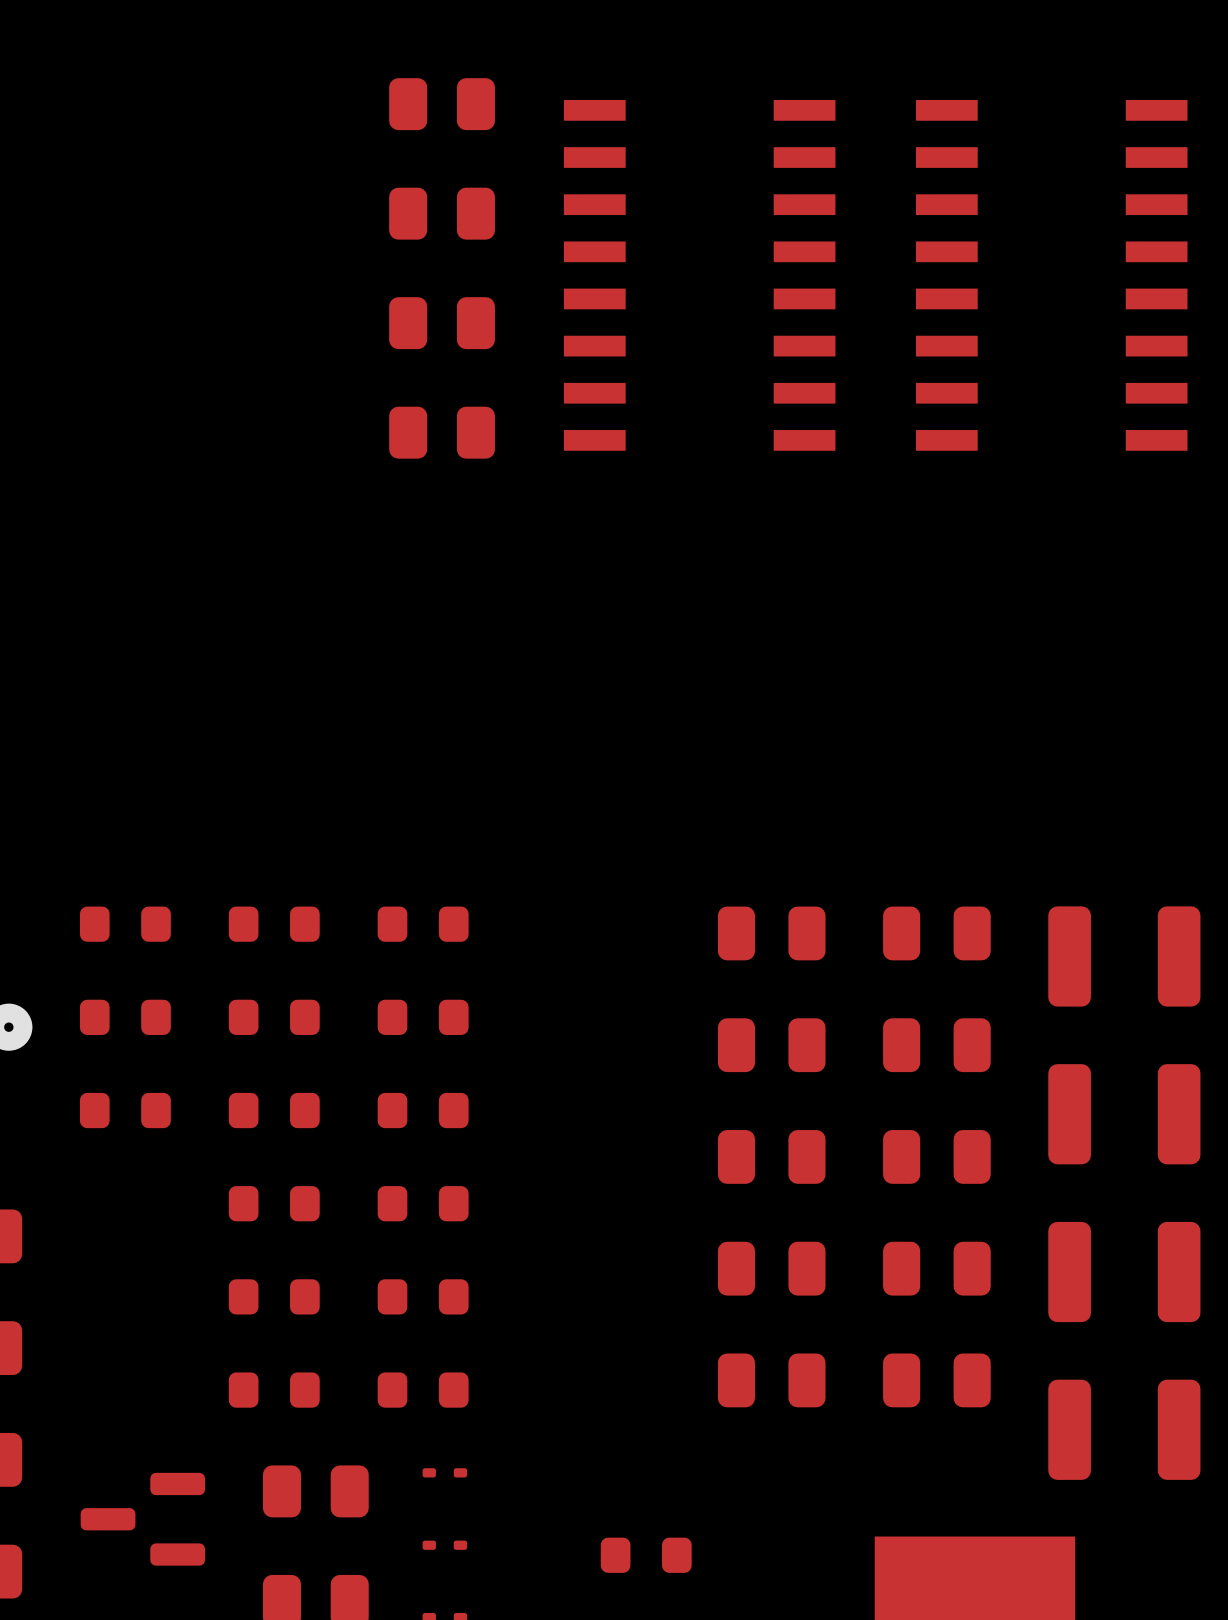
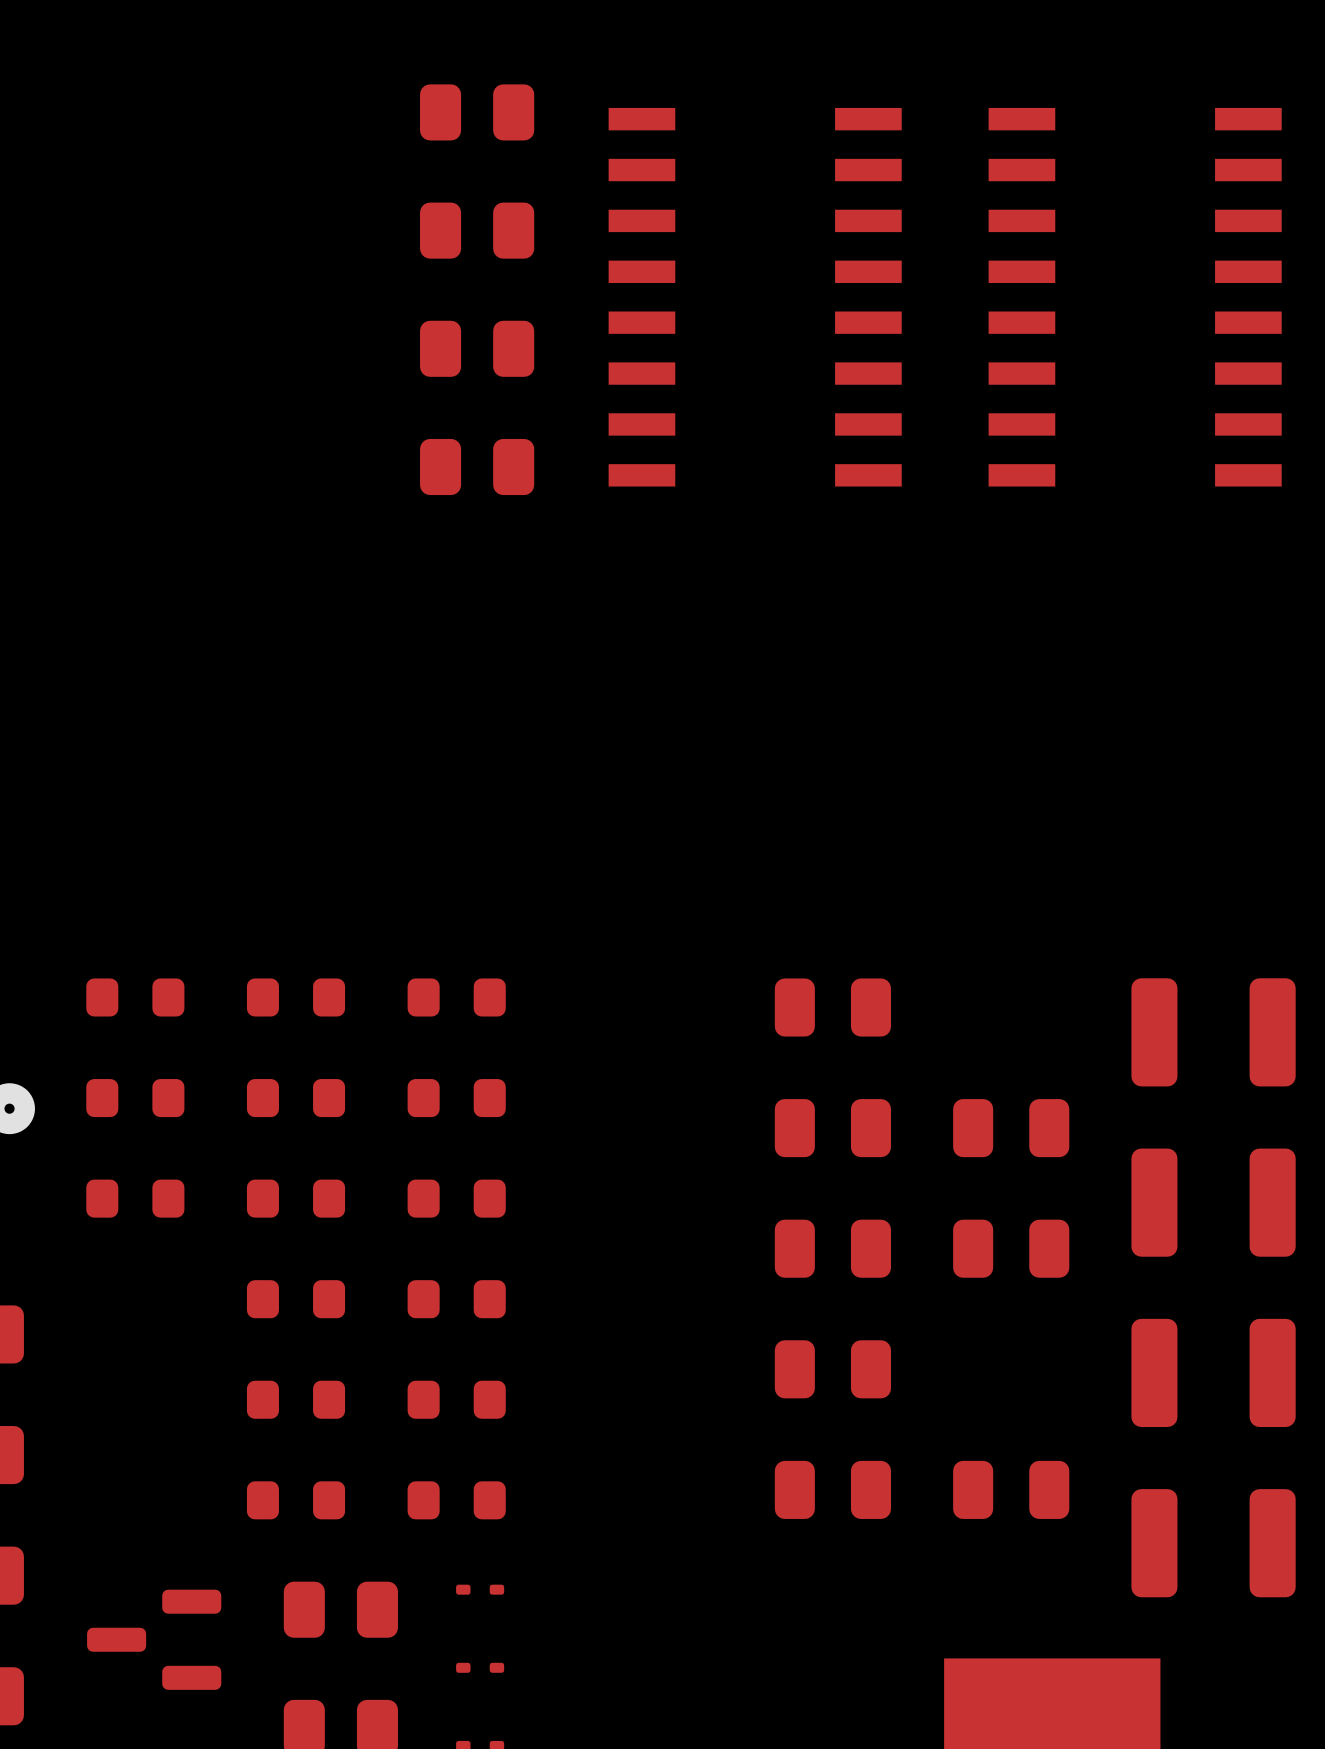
part: (936, 933) -> none
part: (936, 1268) -> none
part: (646, 1555) -> none

